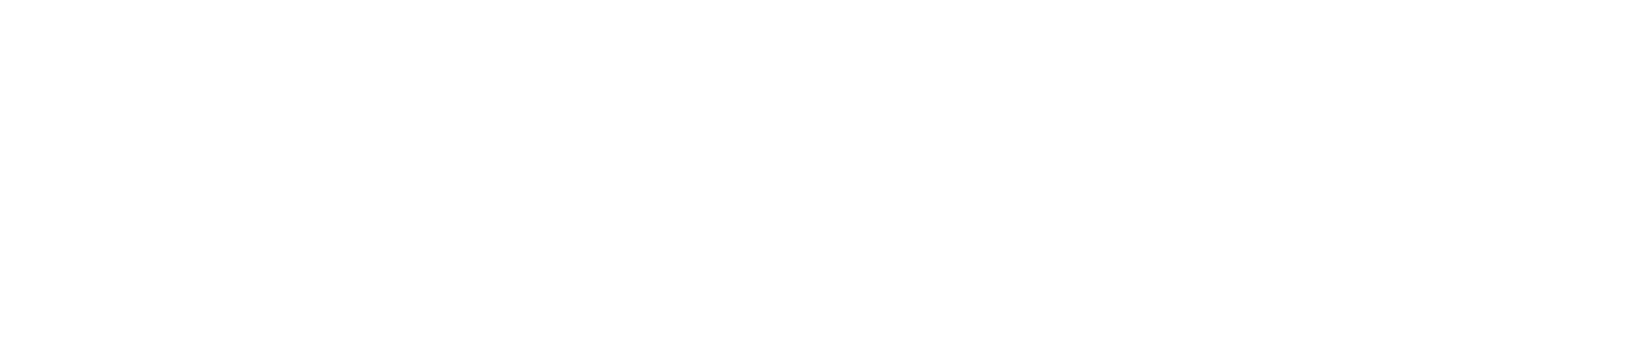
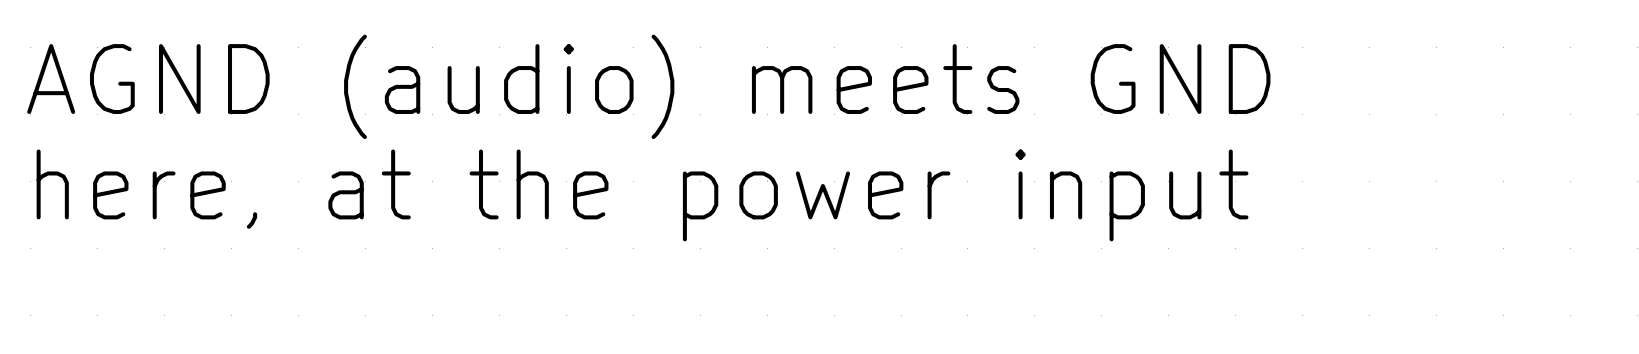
text: none -> AGND (audio) meets GND (648, 86)
text: none -> here, at the power input (642, 195)

